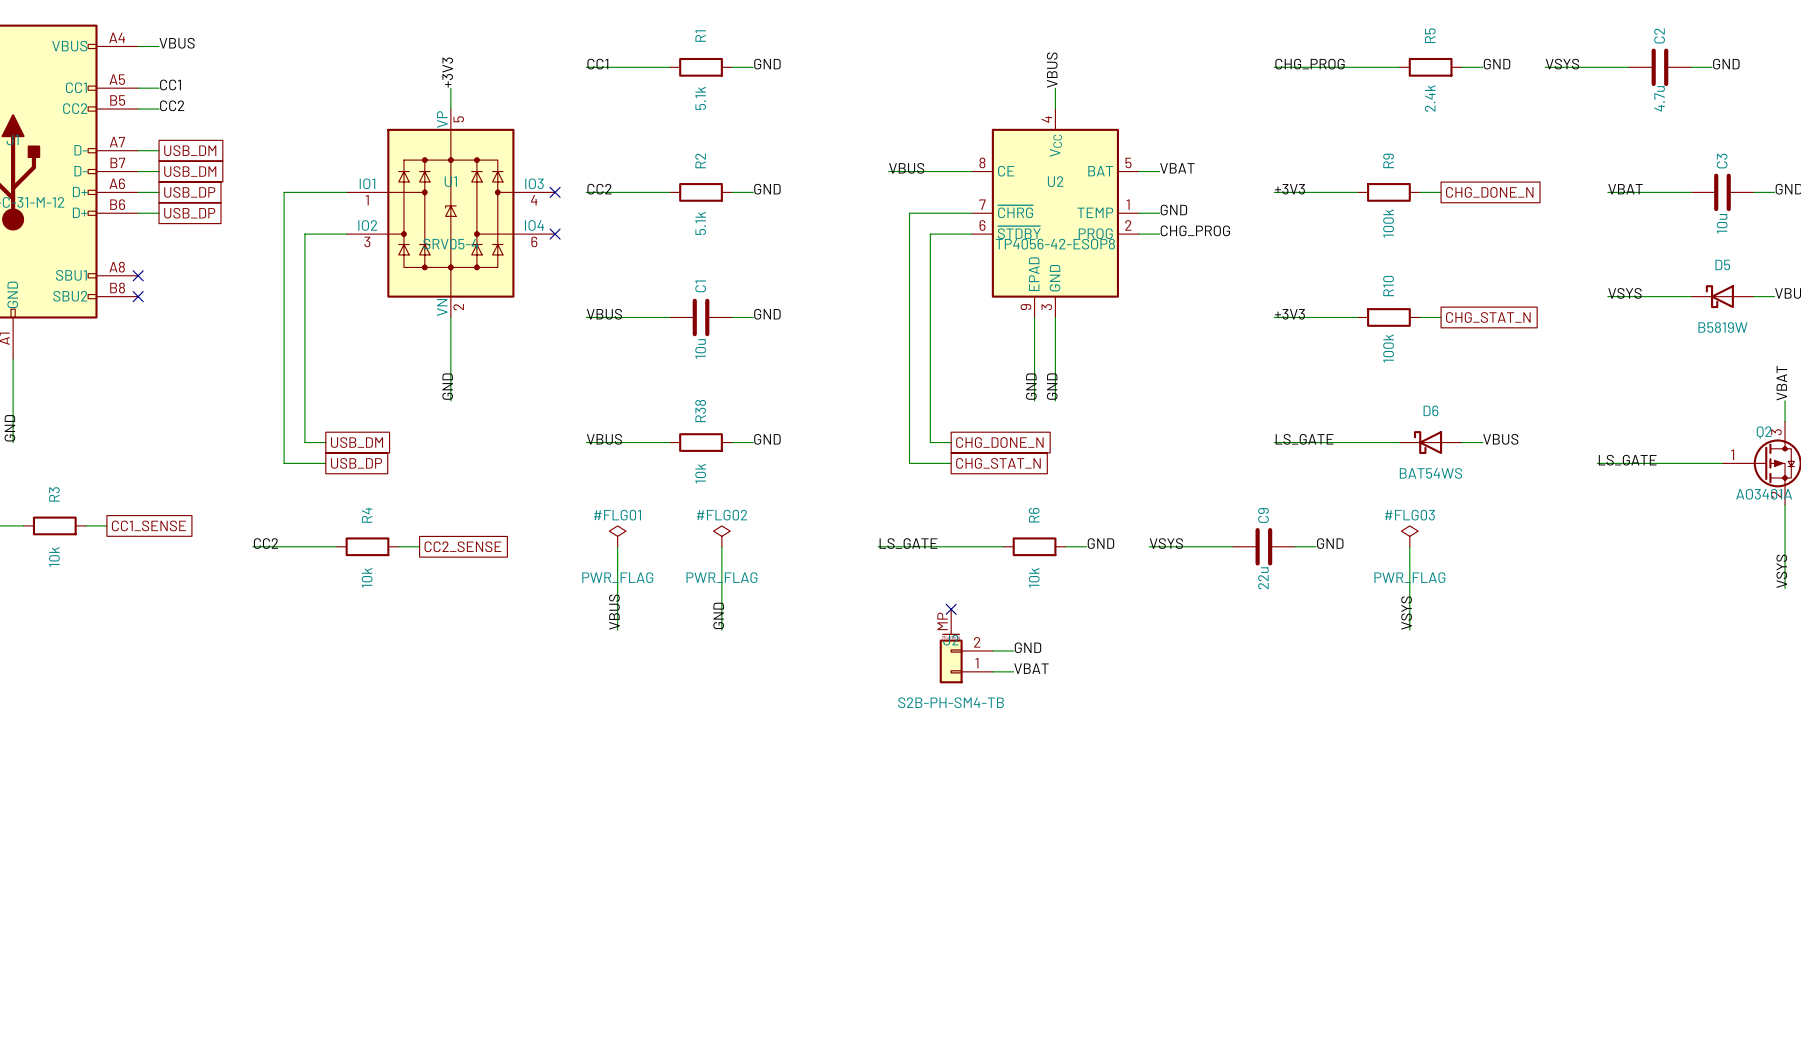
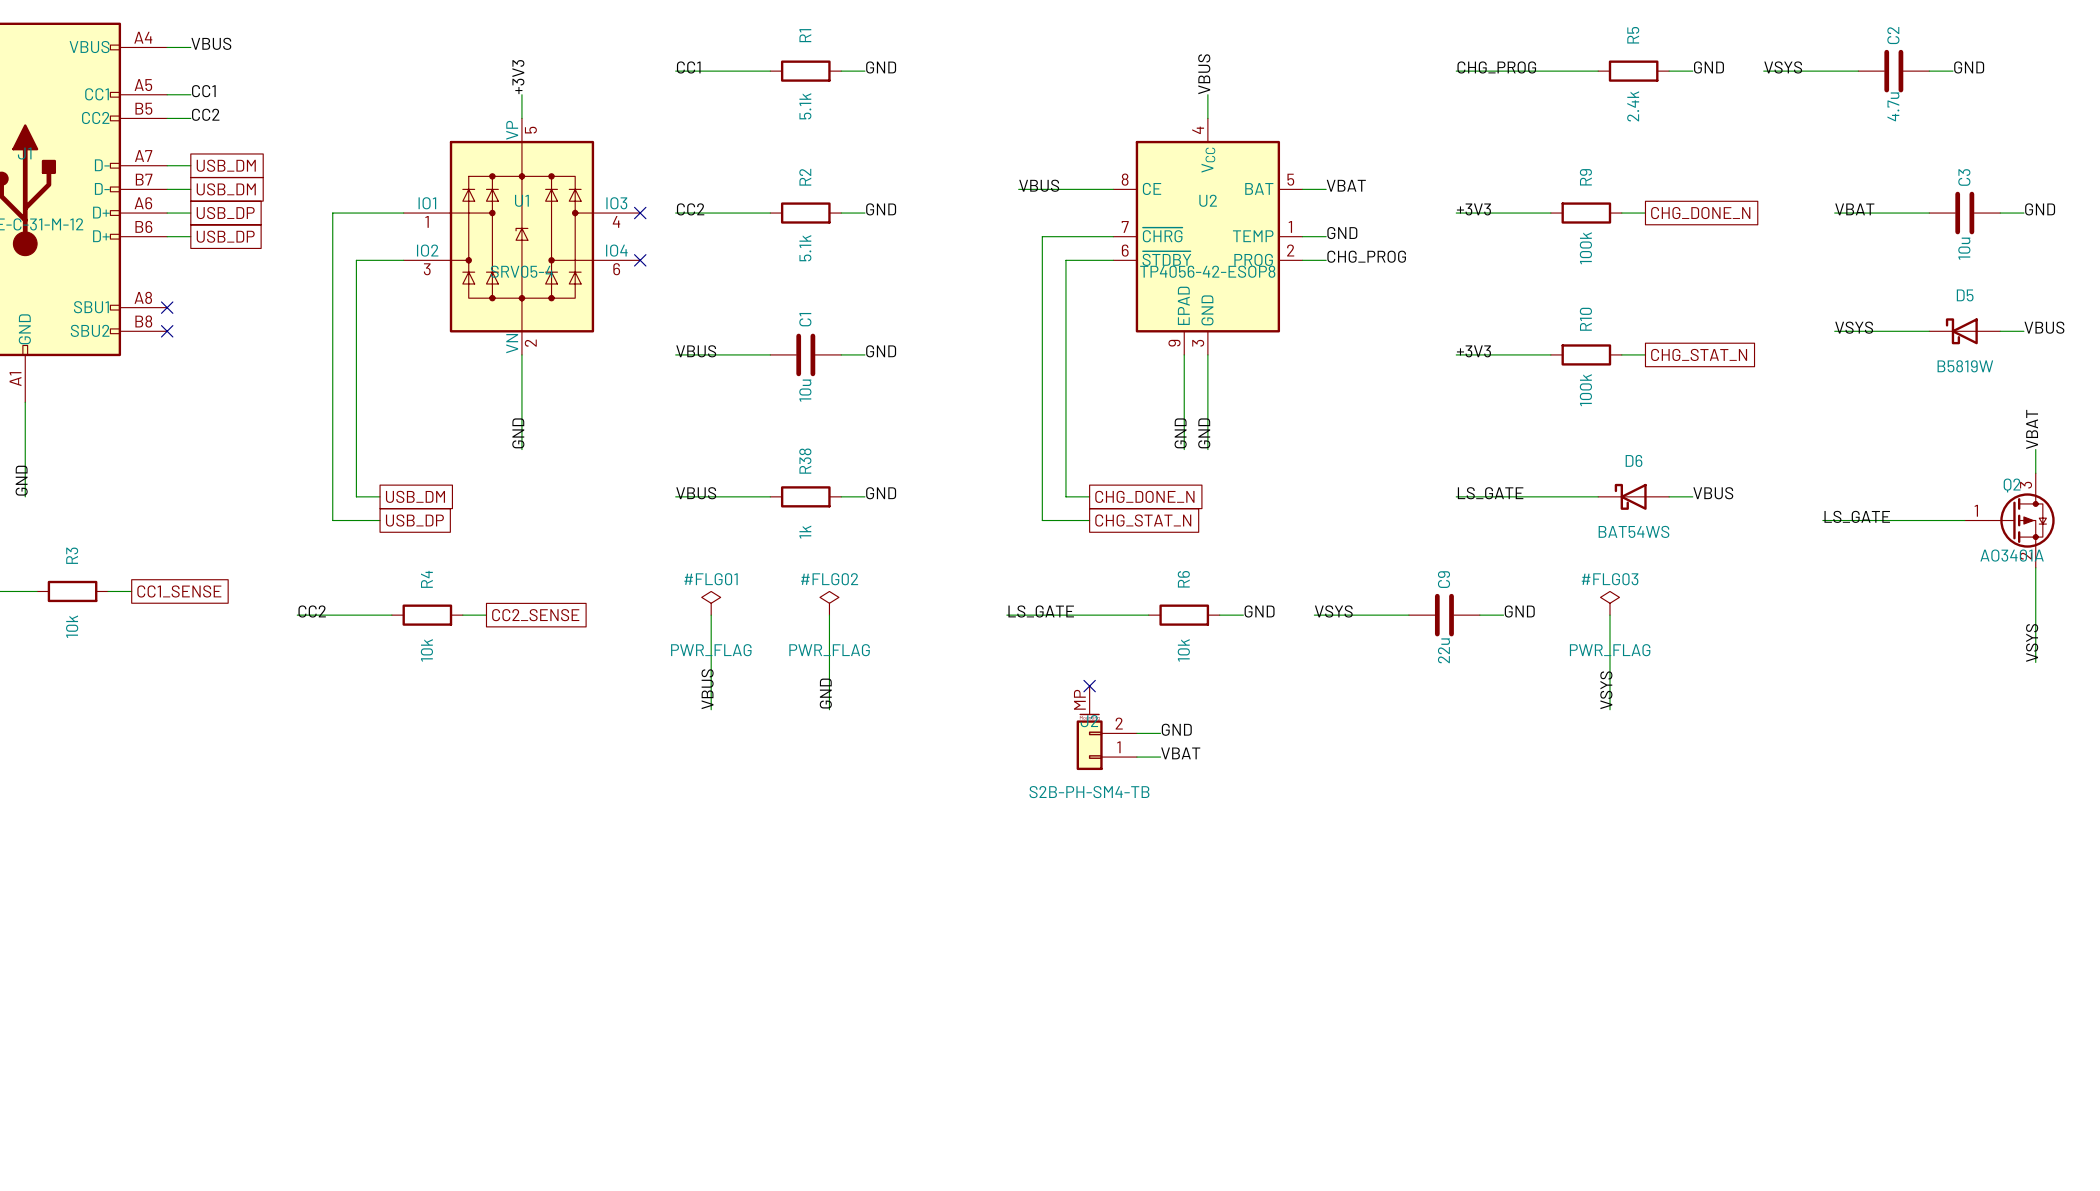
R38 value: 10k (700, 473) -> 1k (805, 532)

